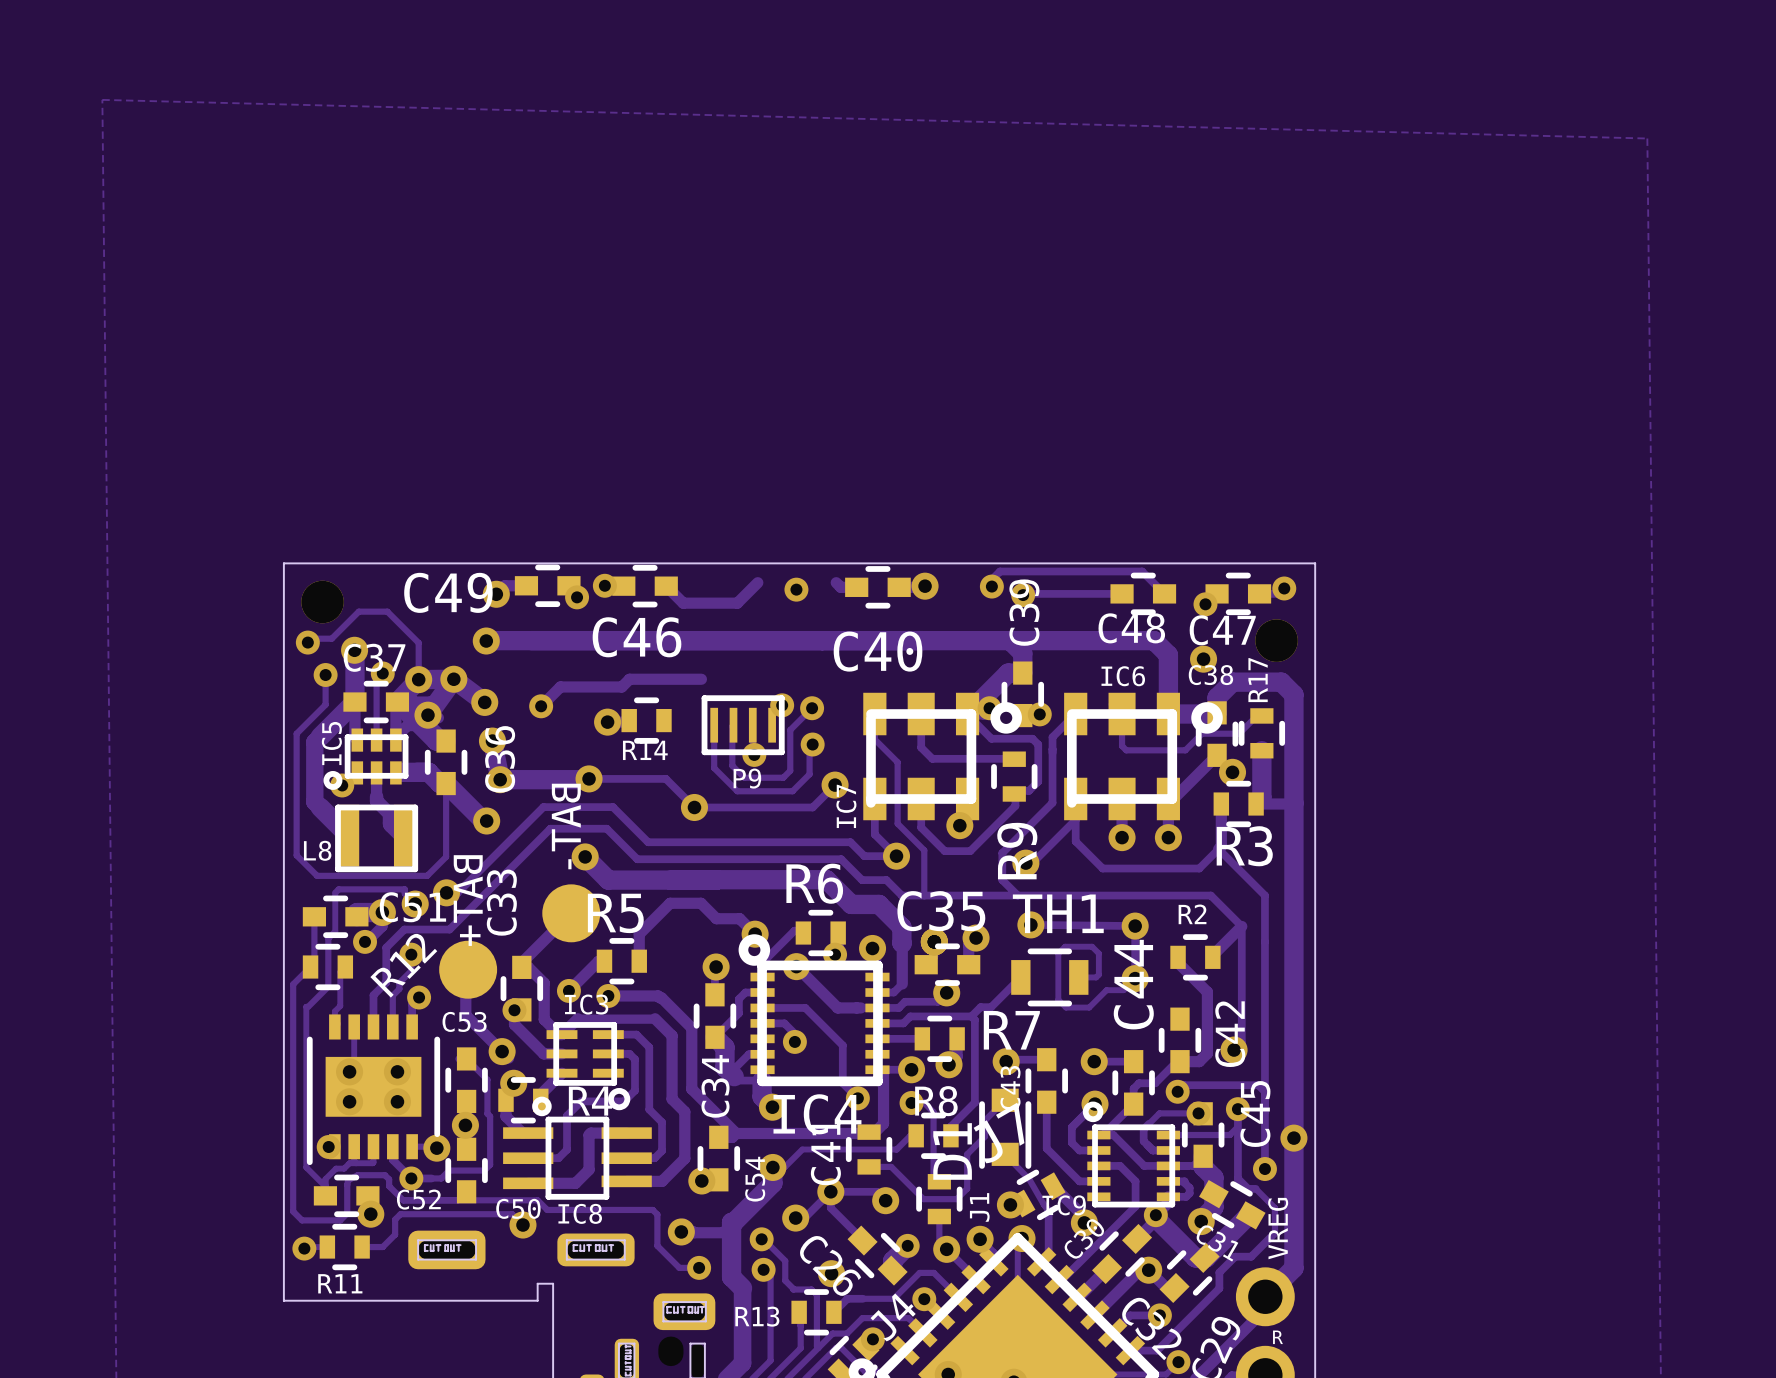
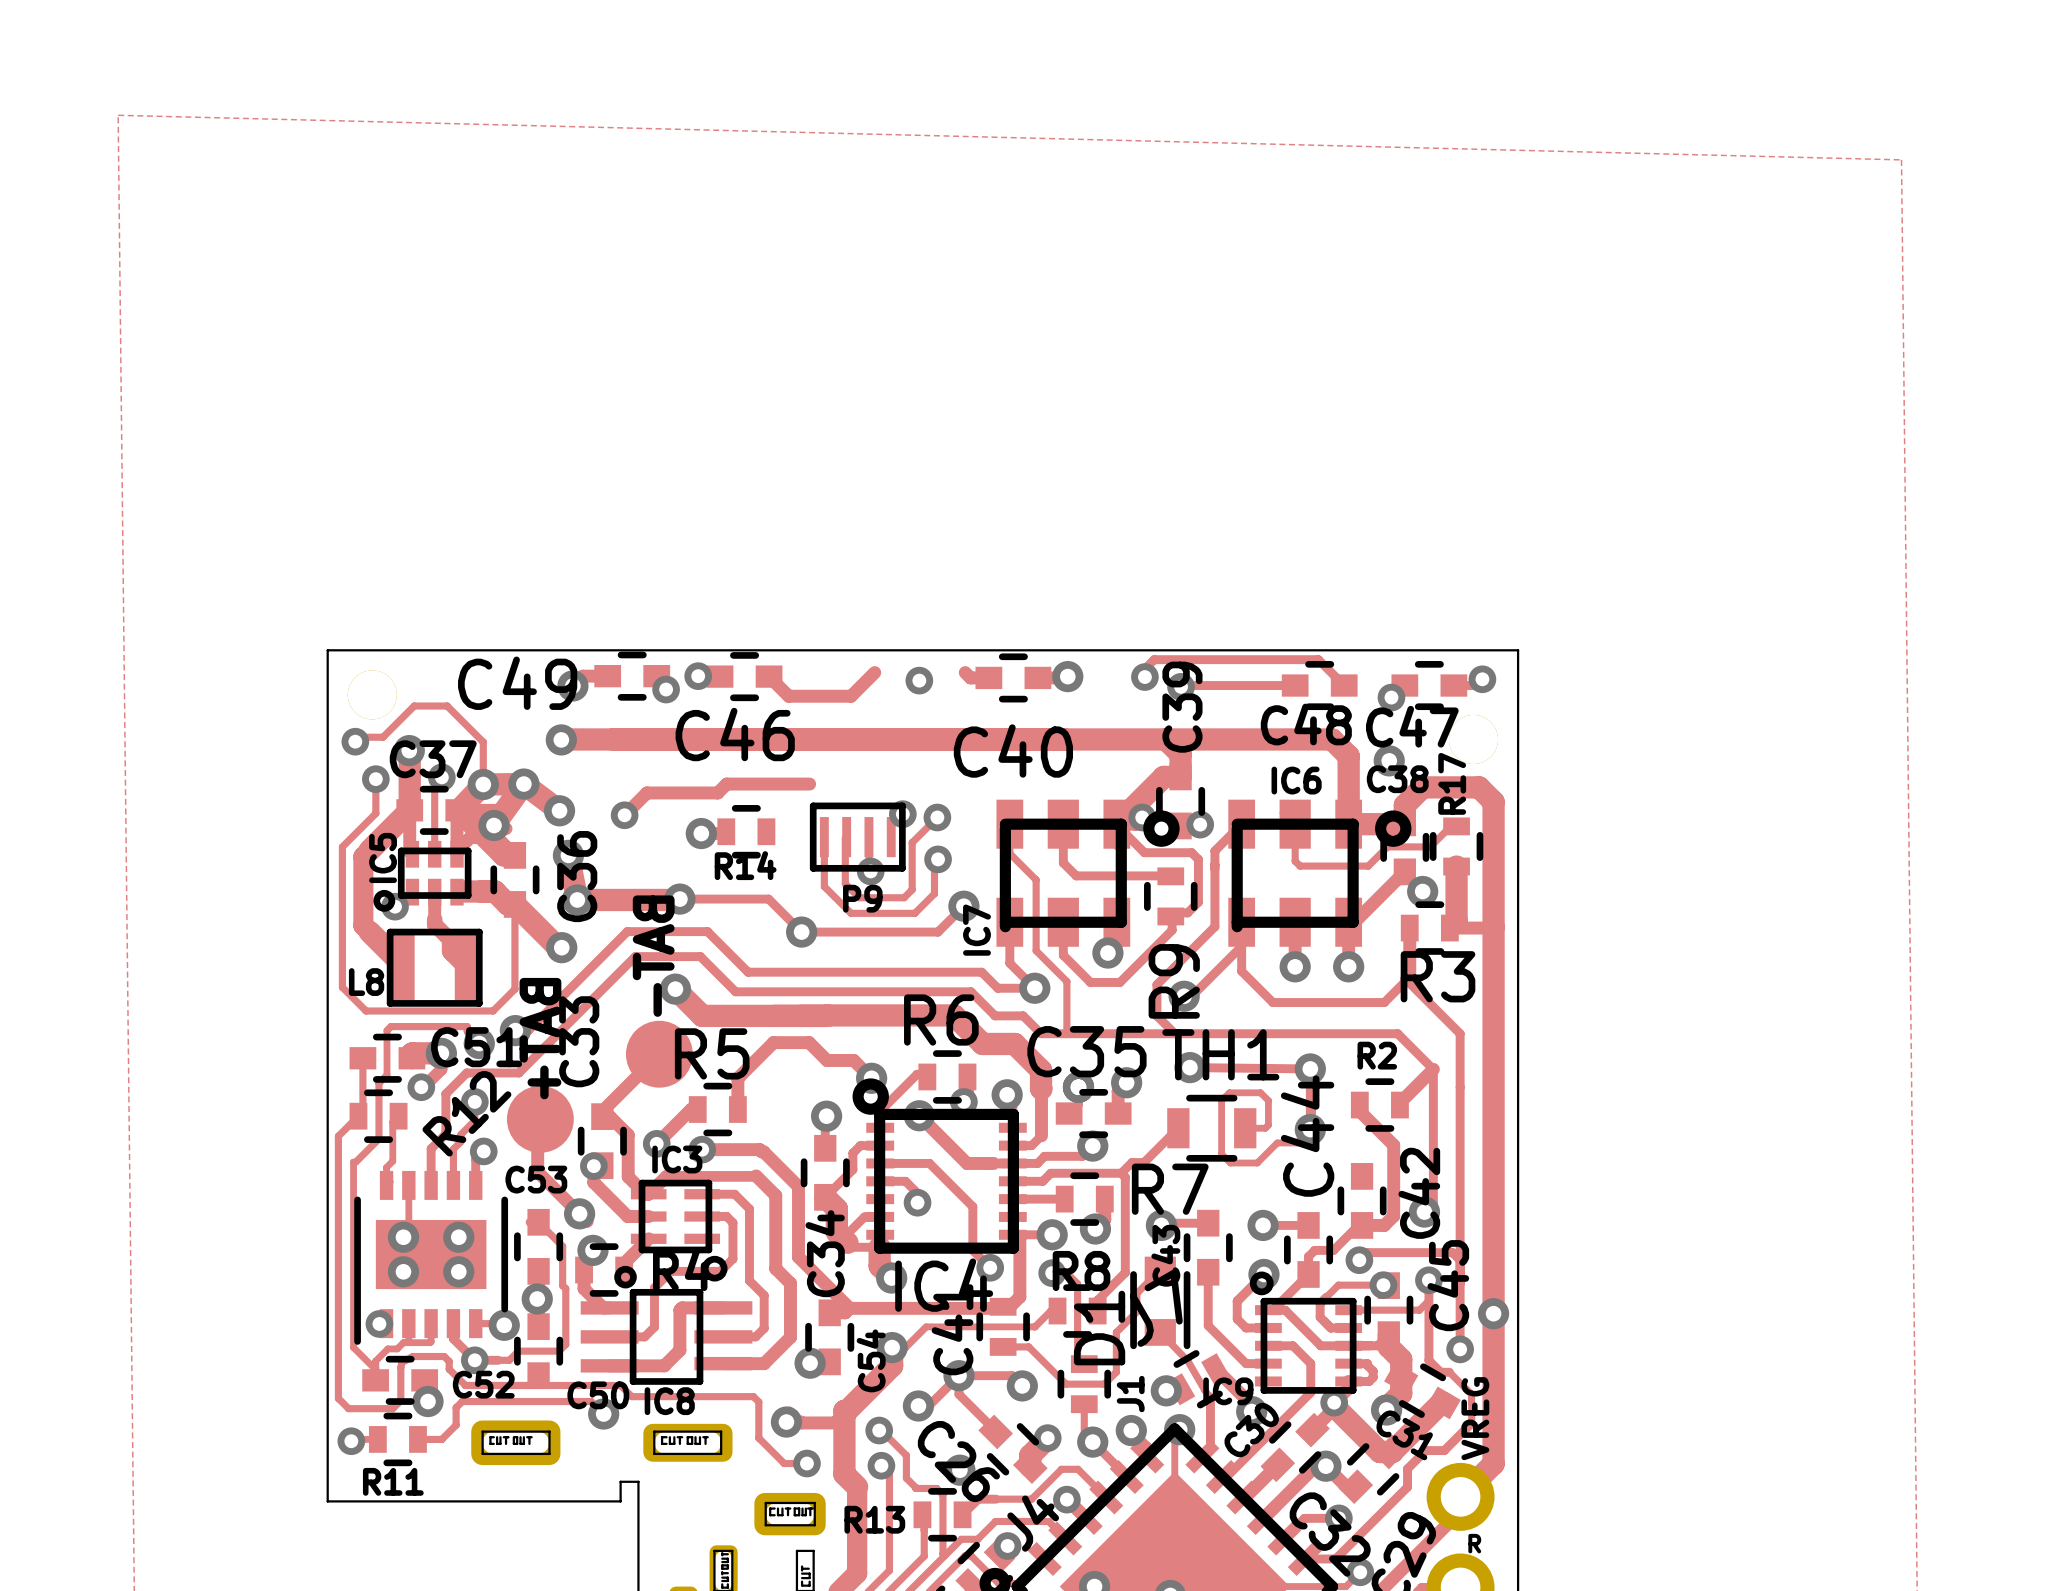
board edge: none -> (802, 1566) (802, 1570)
board edge: none -> (802, 1568) (808, 1568)
board edge: none -> (802, 1573) (809, 1573) (809, 1577)
board edge: none -> (802, 1578) (809, 1578)
board edge: none -> (802, 1581) (802, 1585)
board edge: none -> (809, 1581) (809, 1585) (802, 1585)

